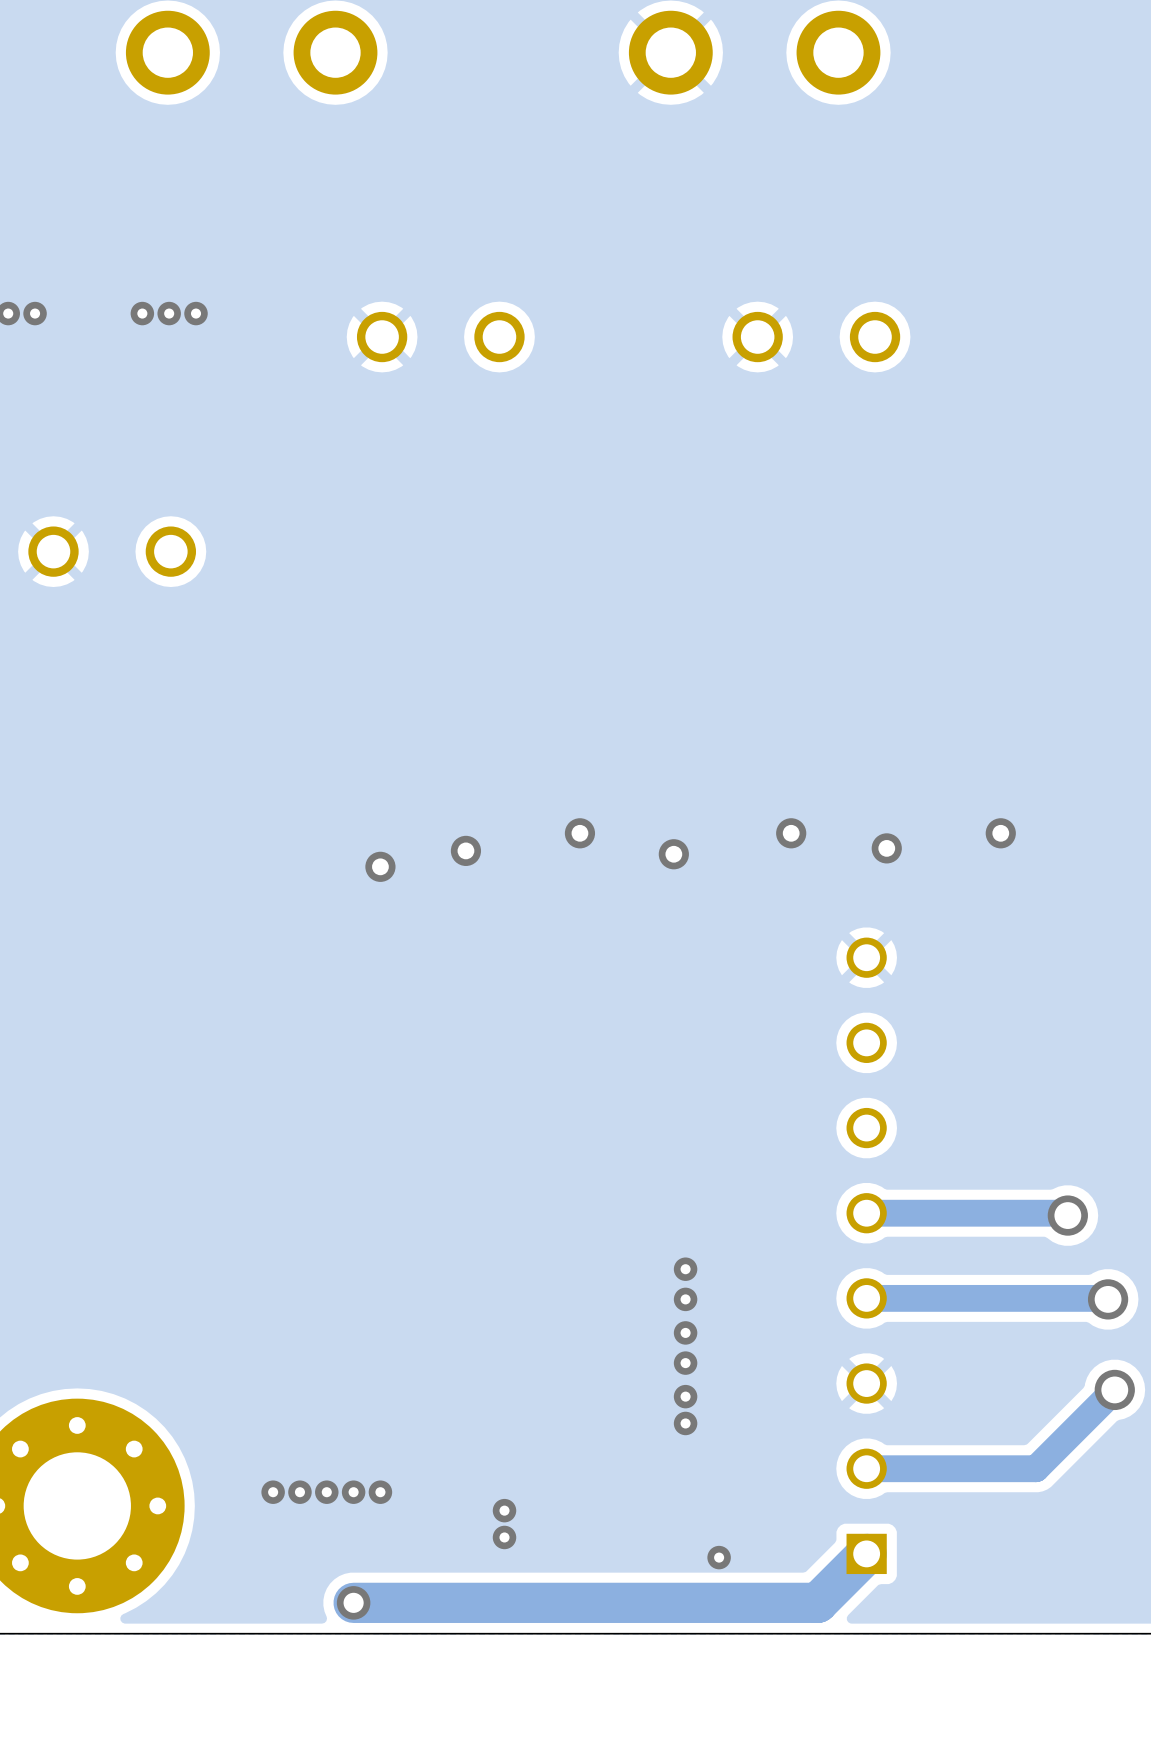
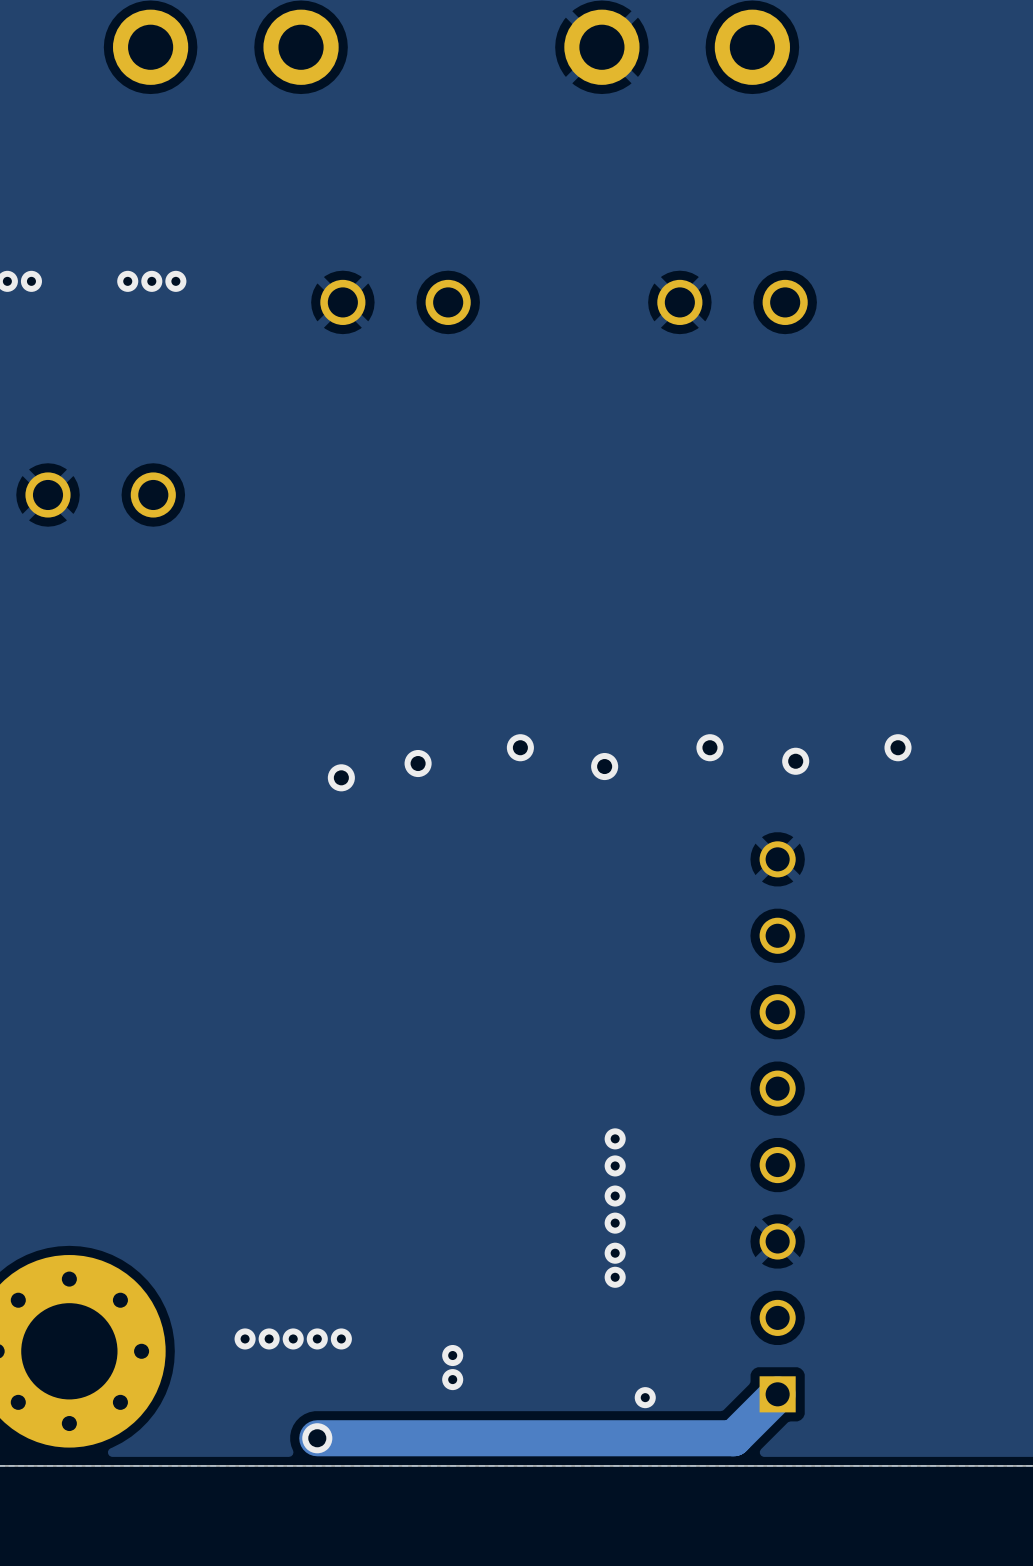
track: (866, 1213) (1065, 1213) (1067, 1215) -> none
via: (1067, 1215) -> none
track: (866, 1298) (1108, 1299) -> none
via: (1108, 1299) -> none
track: (1114, 1389) (1035, 1468) (866, 1468) -> none
via: (1114, 1389) -> none

